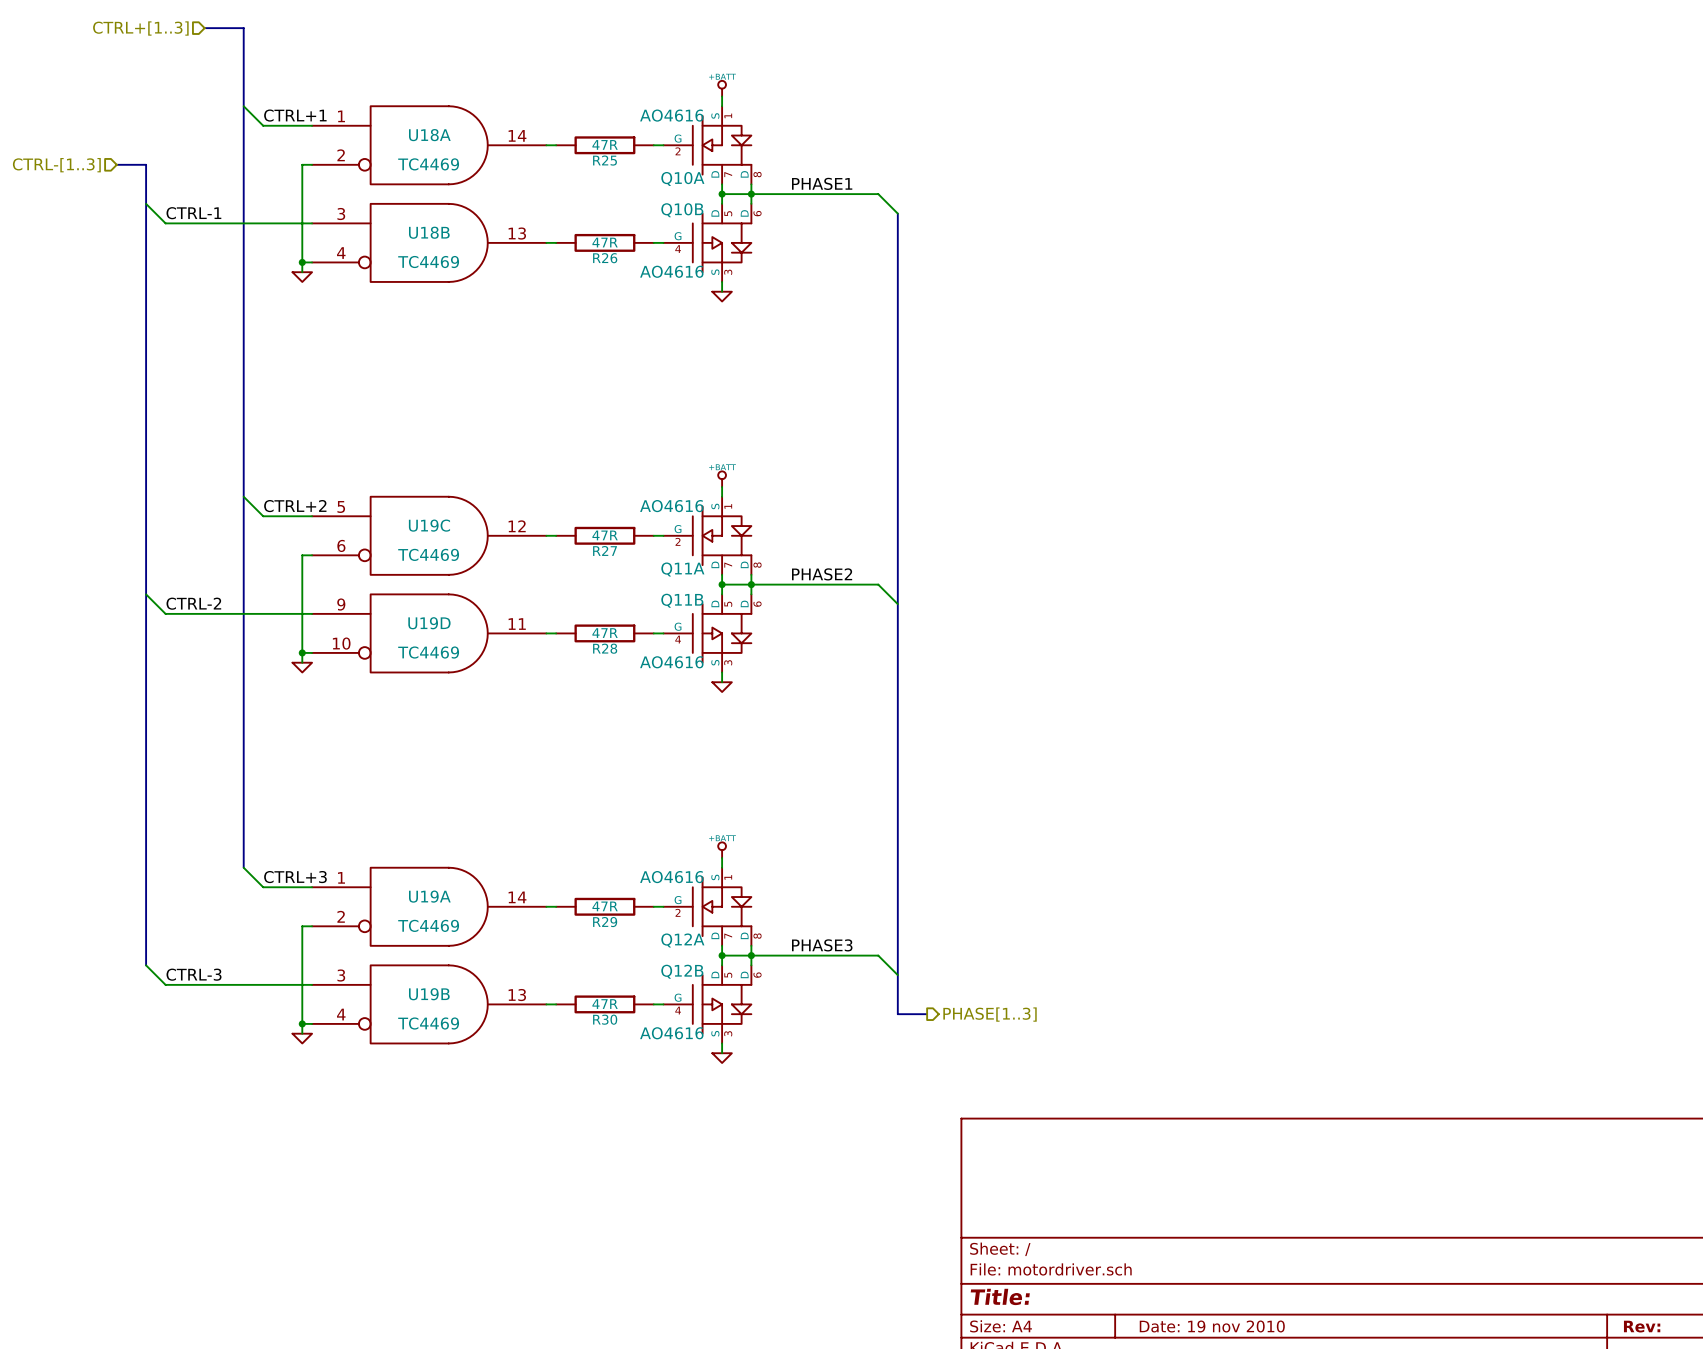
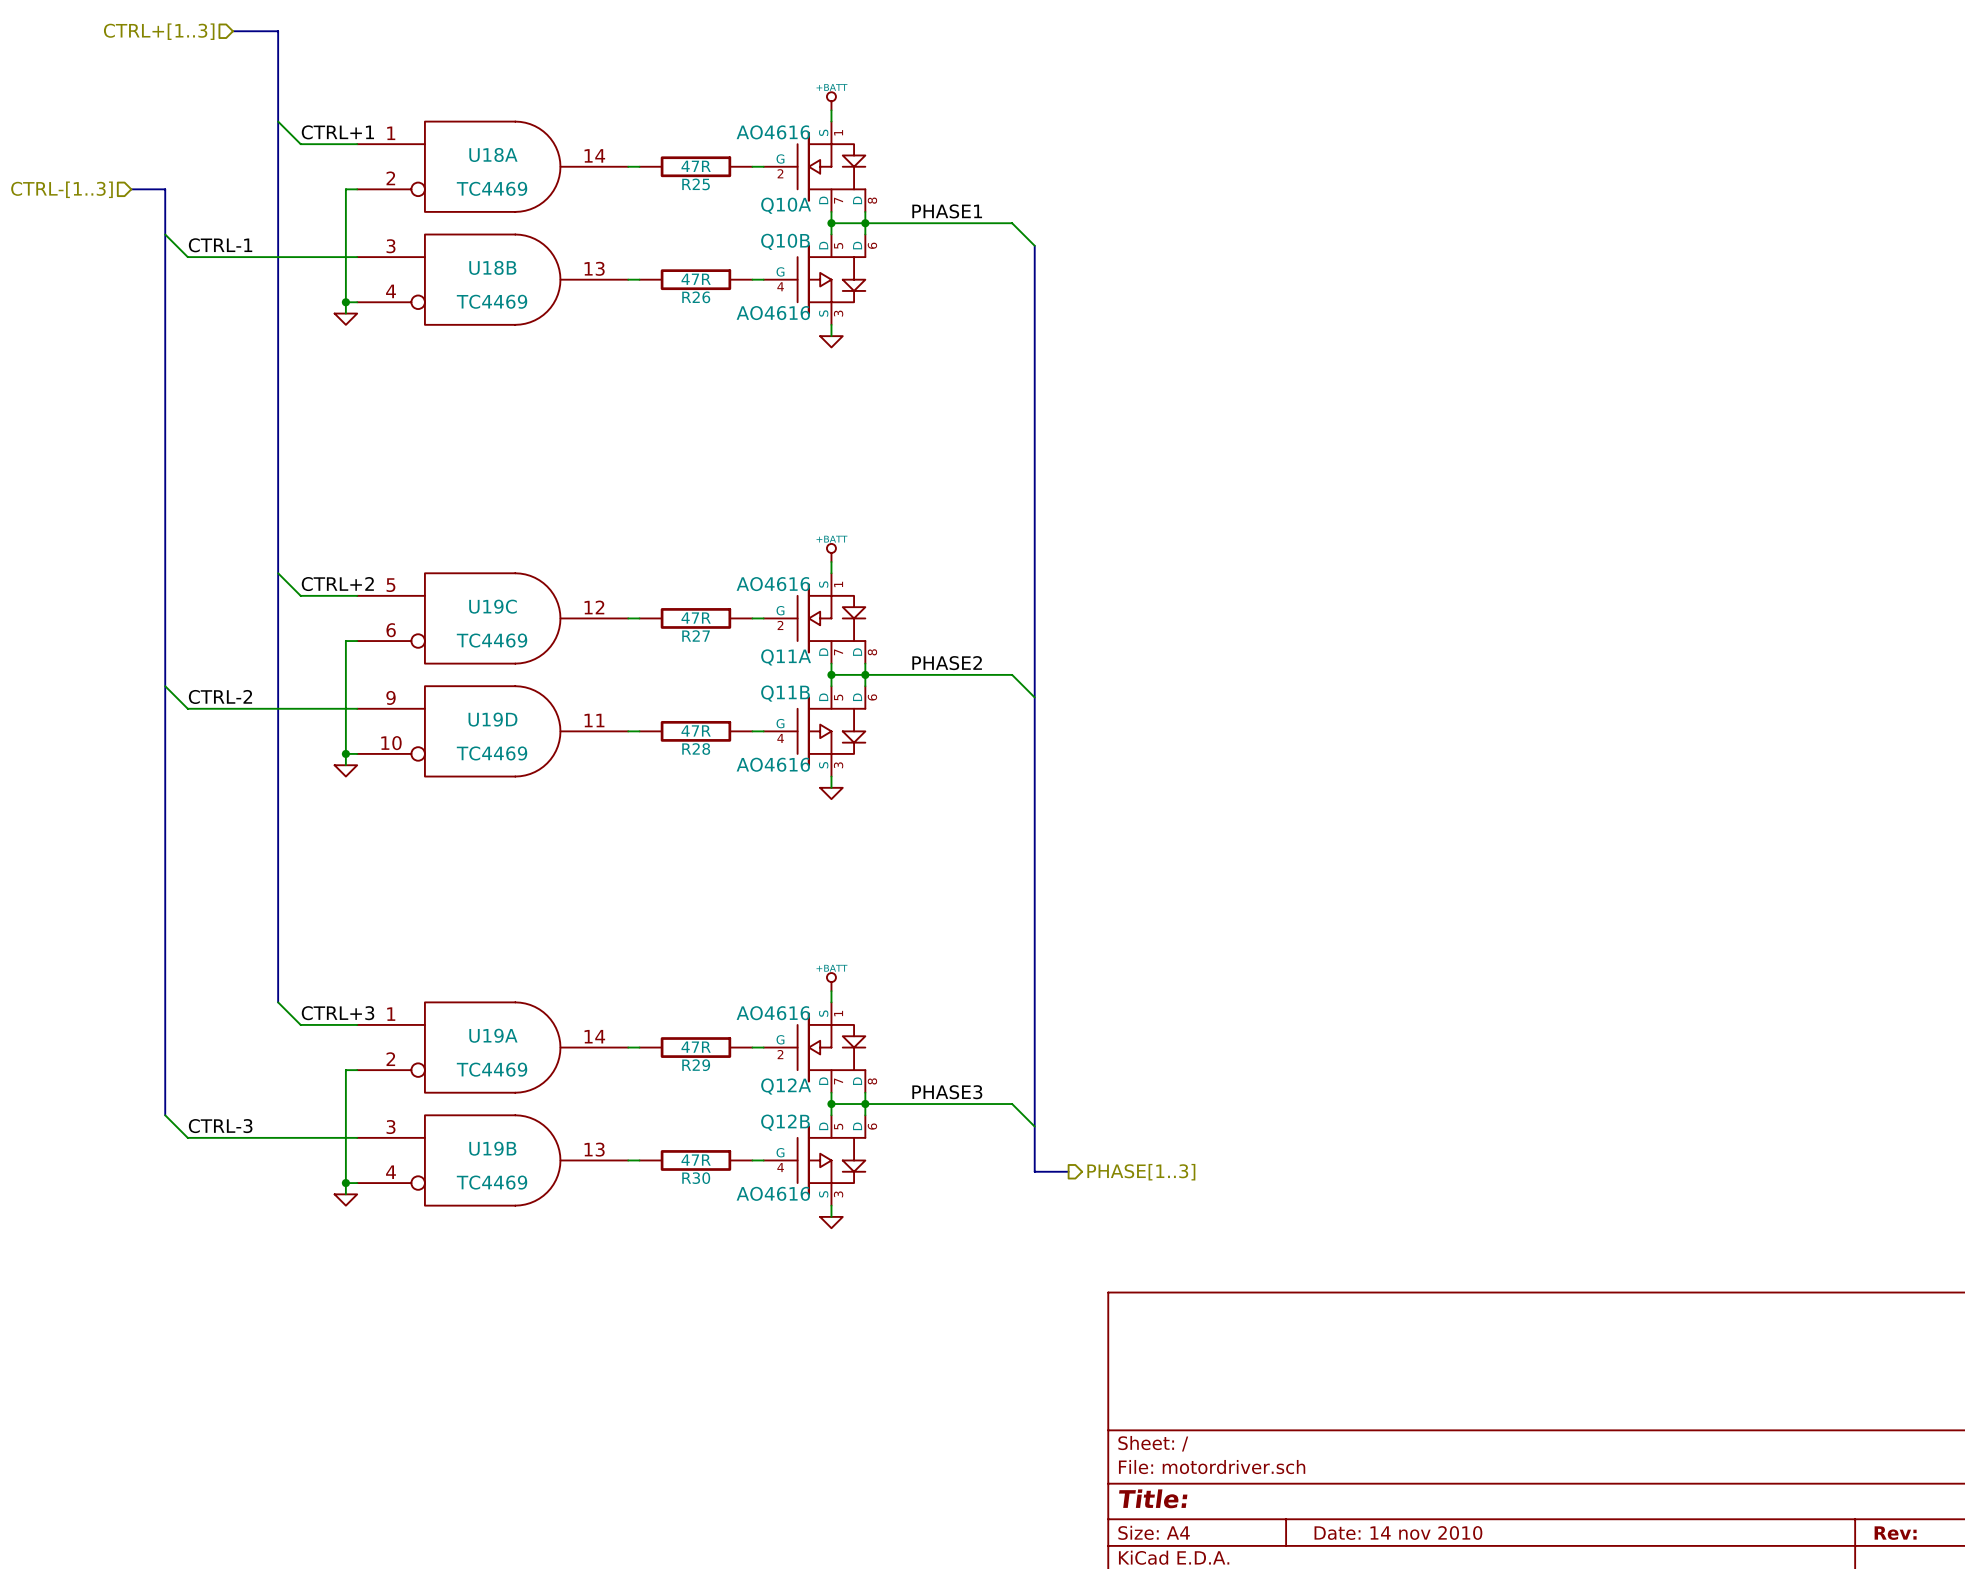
title block: Date: 19 nov 2010 (1212, 1326) -> Date: 14 nov 2010 (1398, 1533)

